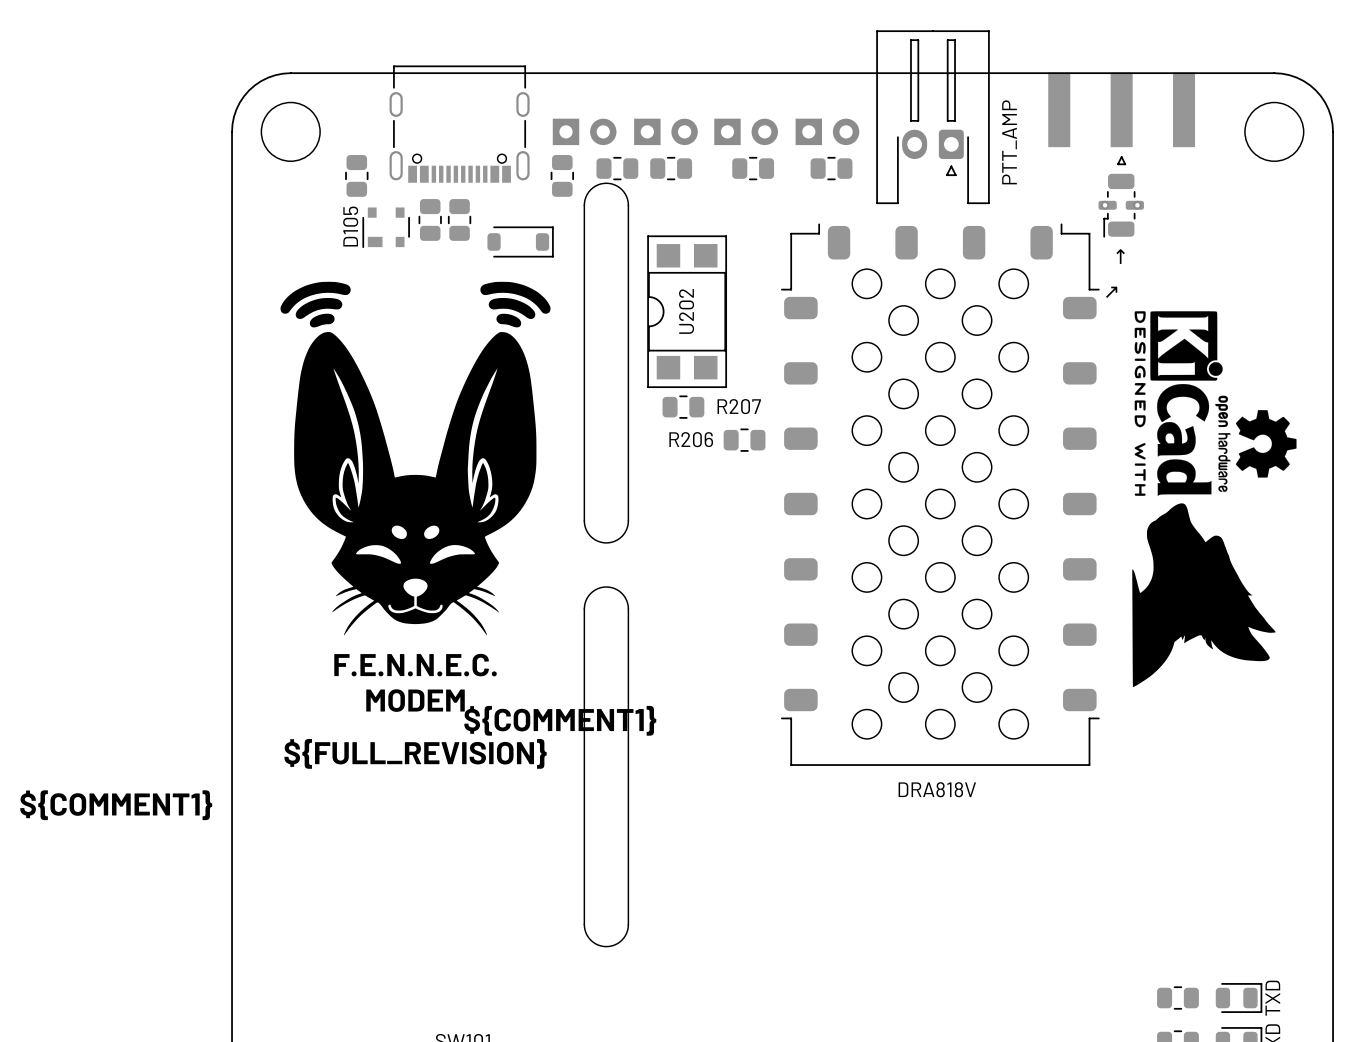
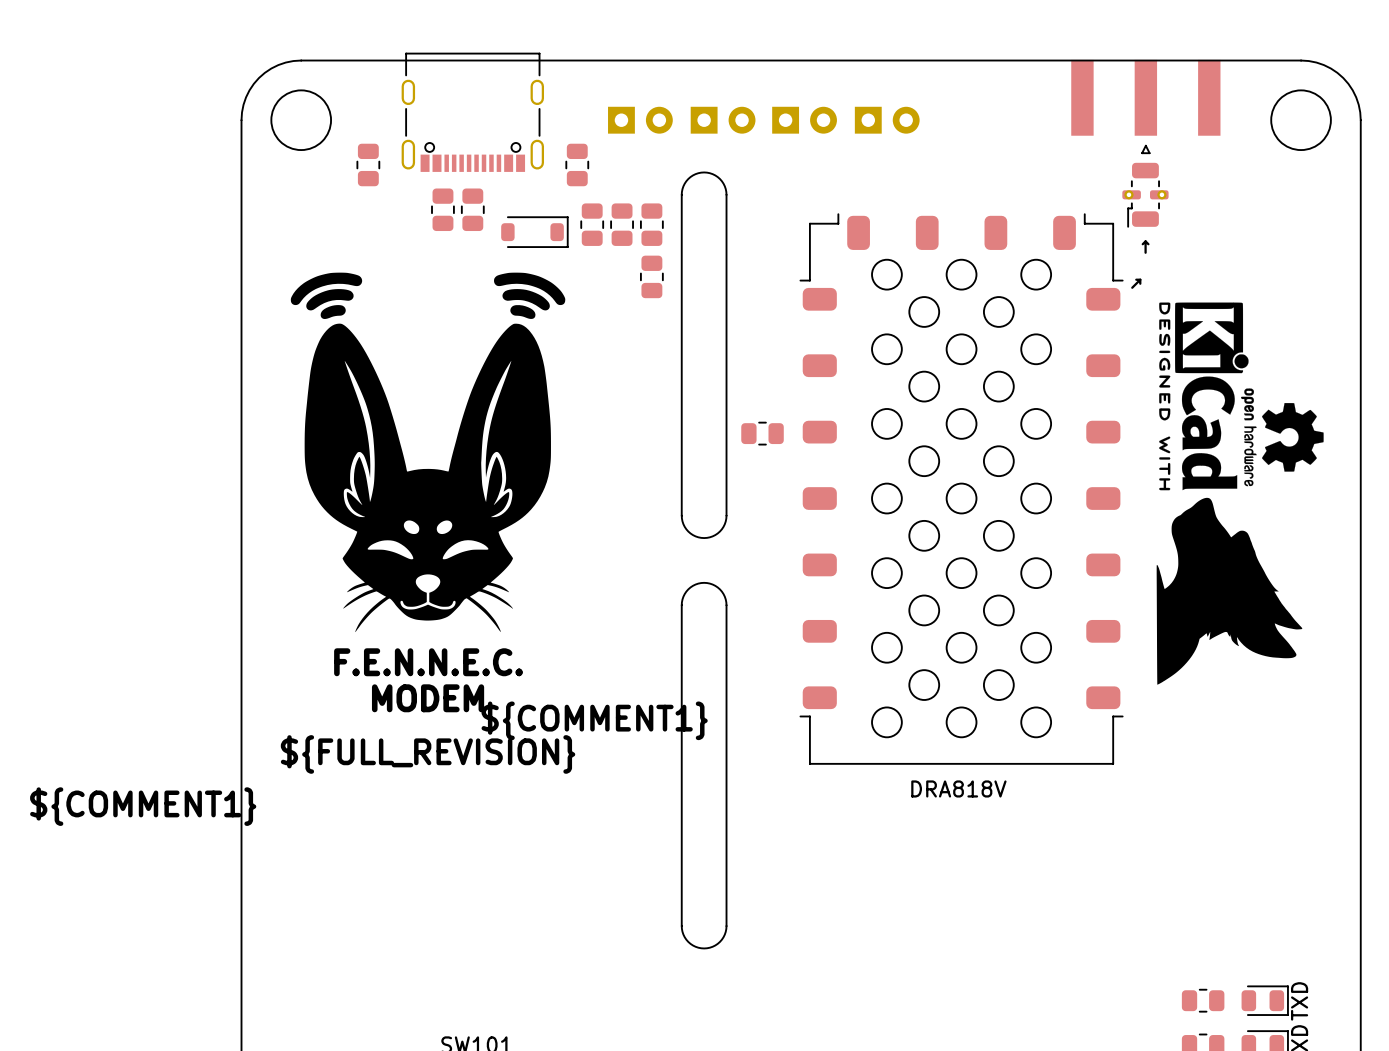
part: PTT_AMP (933, 117) -> none
part: (584, 131) -> none
part: none -> (640, 120)
part: (665, 131) -> none
part: none -> (723, 120)
part: (746, 131) -> none
part: none -> (804, 120)
part: (827, 131) -> none
part: none -> (887, 120)
part: (617, 168) -> none
part: (671, 168) -> none
part: (753, 168) -> none
part: (831, 168) -> none
board edge: (584, 205) (584, 523) (587, 531) (592, 538) (600, 542) (609, 542) (621, 536) (626, 529) (628, 520) (628, 202) (625, 194) (619, 187) (612, 184) (603, 183) (590, 189) (586, 196) (584, 205) -> (681, 194) (681, 518) (684, 526) (690, 533) (698, 537) (707, 537) (715, 535) (721, 529) (726, 515) (726, 191) (723, 183) (717, 177) (709, 173) (701, 172) (688, 179) (683, 186) (681, 194)
D105: (386, 227) -> none
part: none -> (592, 224)
part: none -> (622, 224)
part: none -> (651, 224)
part: none -> (651, 276)
U202: (687, 311) -> none
R207: (683, 407) -> none
R206 name: R206 (691, 439) -> none
board edge: (584, 608) (584, 927) (587, 935) (592, 942) (600, 945) (609, 946) (621, 940) (626, 933) (628, 924) (628, 606) (625, 597) (619, 591) (612, 587) (603, 587) (590, 593) (586, 600) (584, 608) -> (681, 605) (681, 929) (684, 937) (690, 943) (698, 947) (707, 948) (715, 945) (721, 939) (726, 926) (726, 602) (723, 594) (717, 587) (709, 583) (701, 583) (692, 585) (686, 591) (681, 605)

